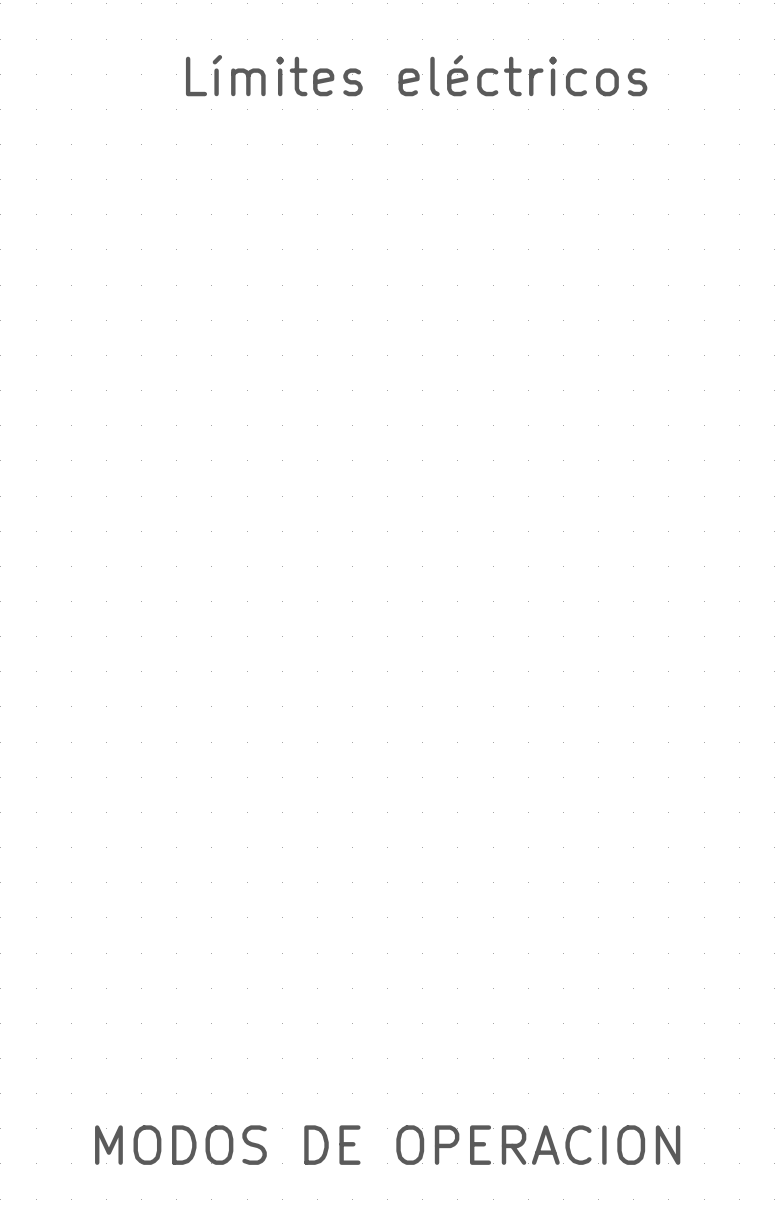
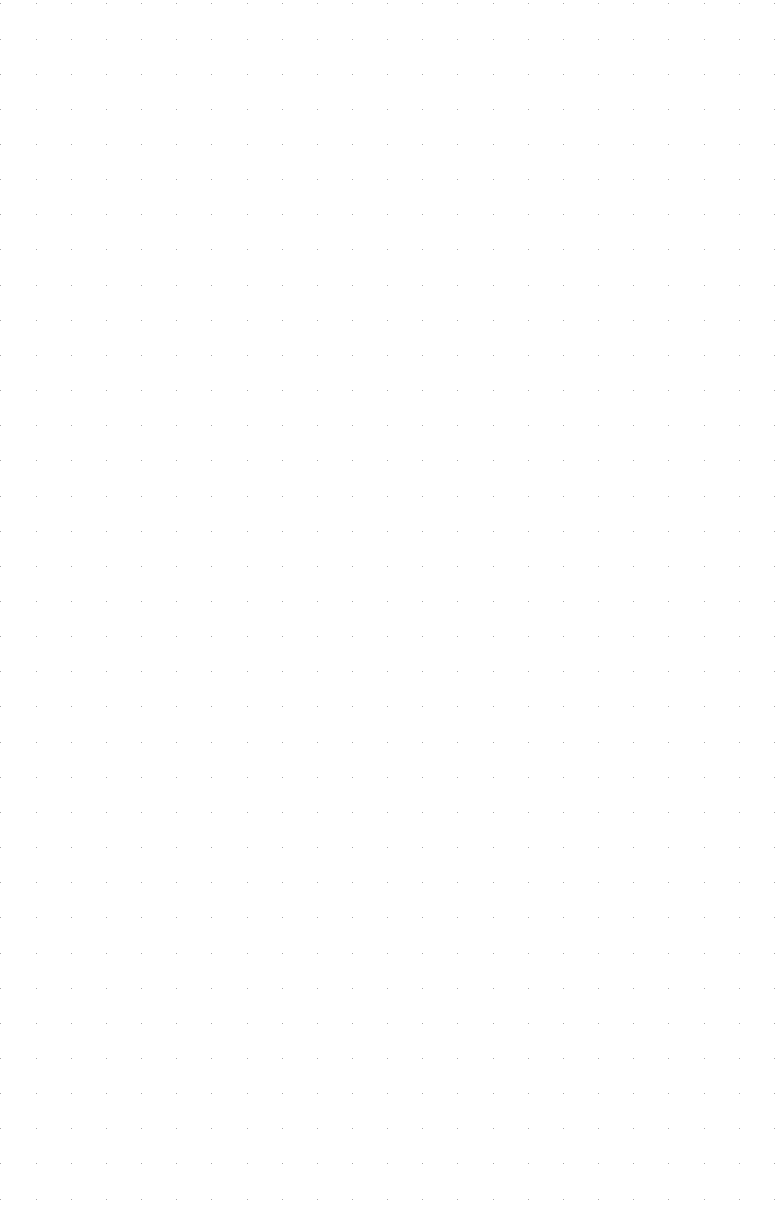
text: Límites eléctricos (416, 75) -> none
text: MODOS DE OPERACION (387, 1145) -> none

